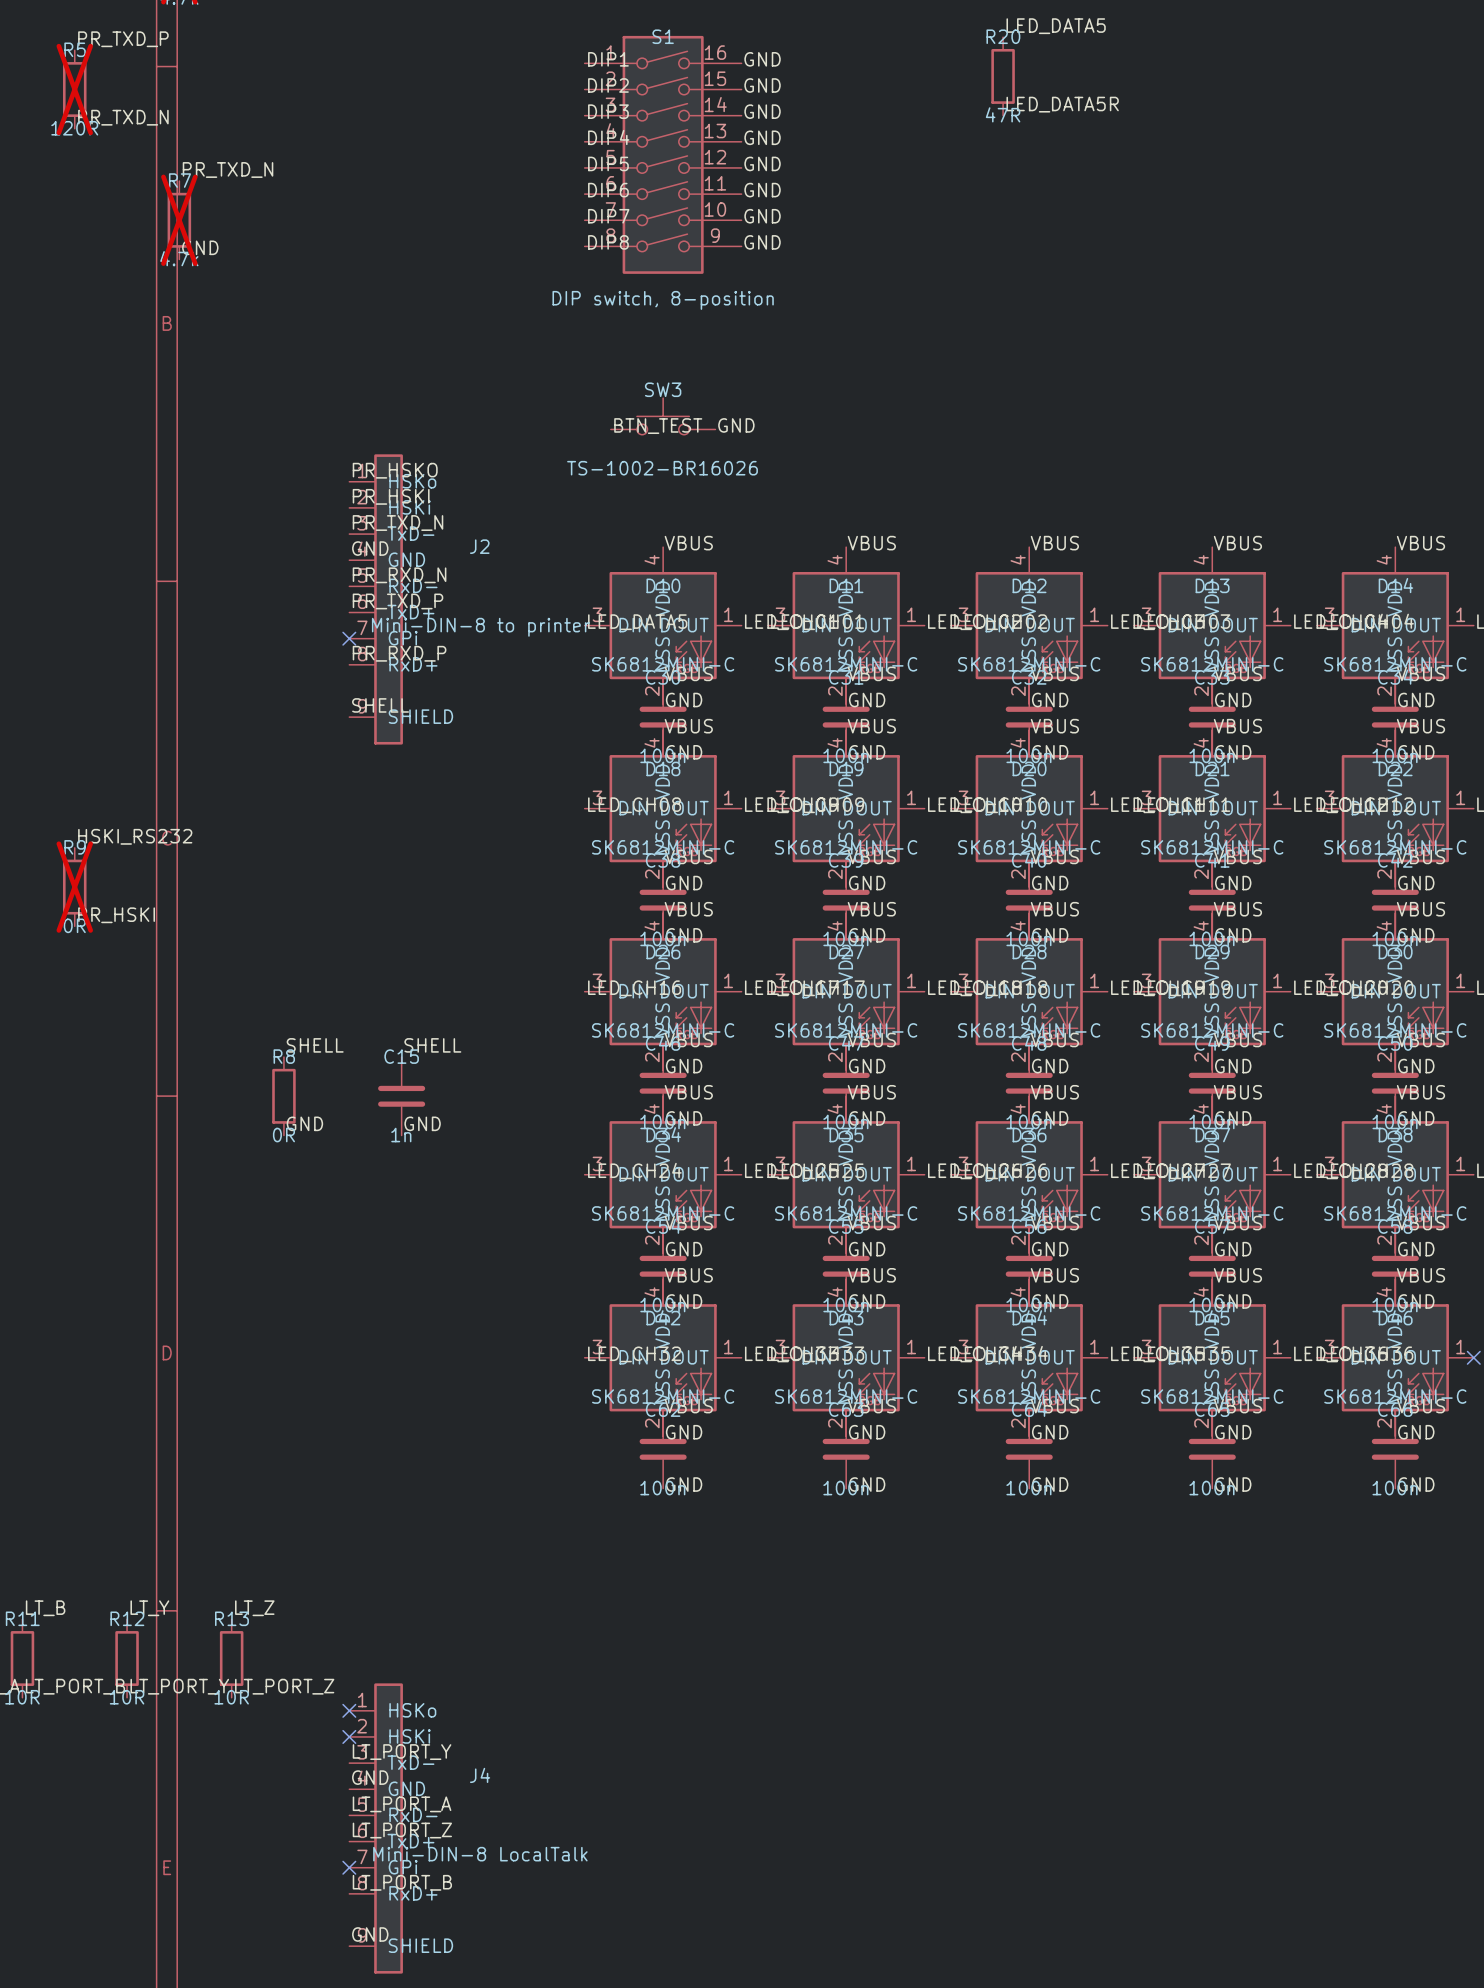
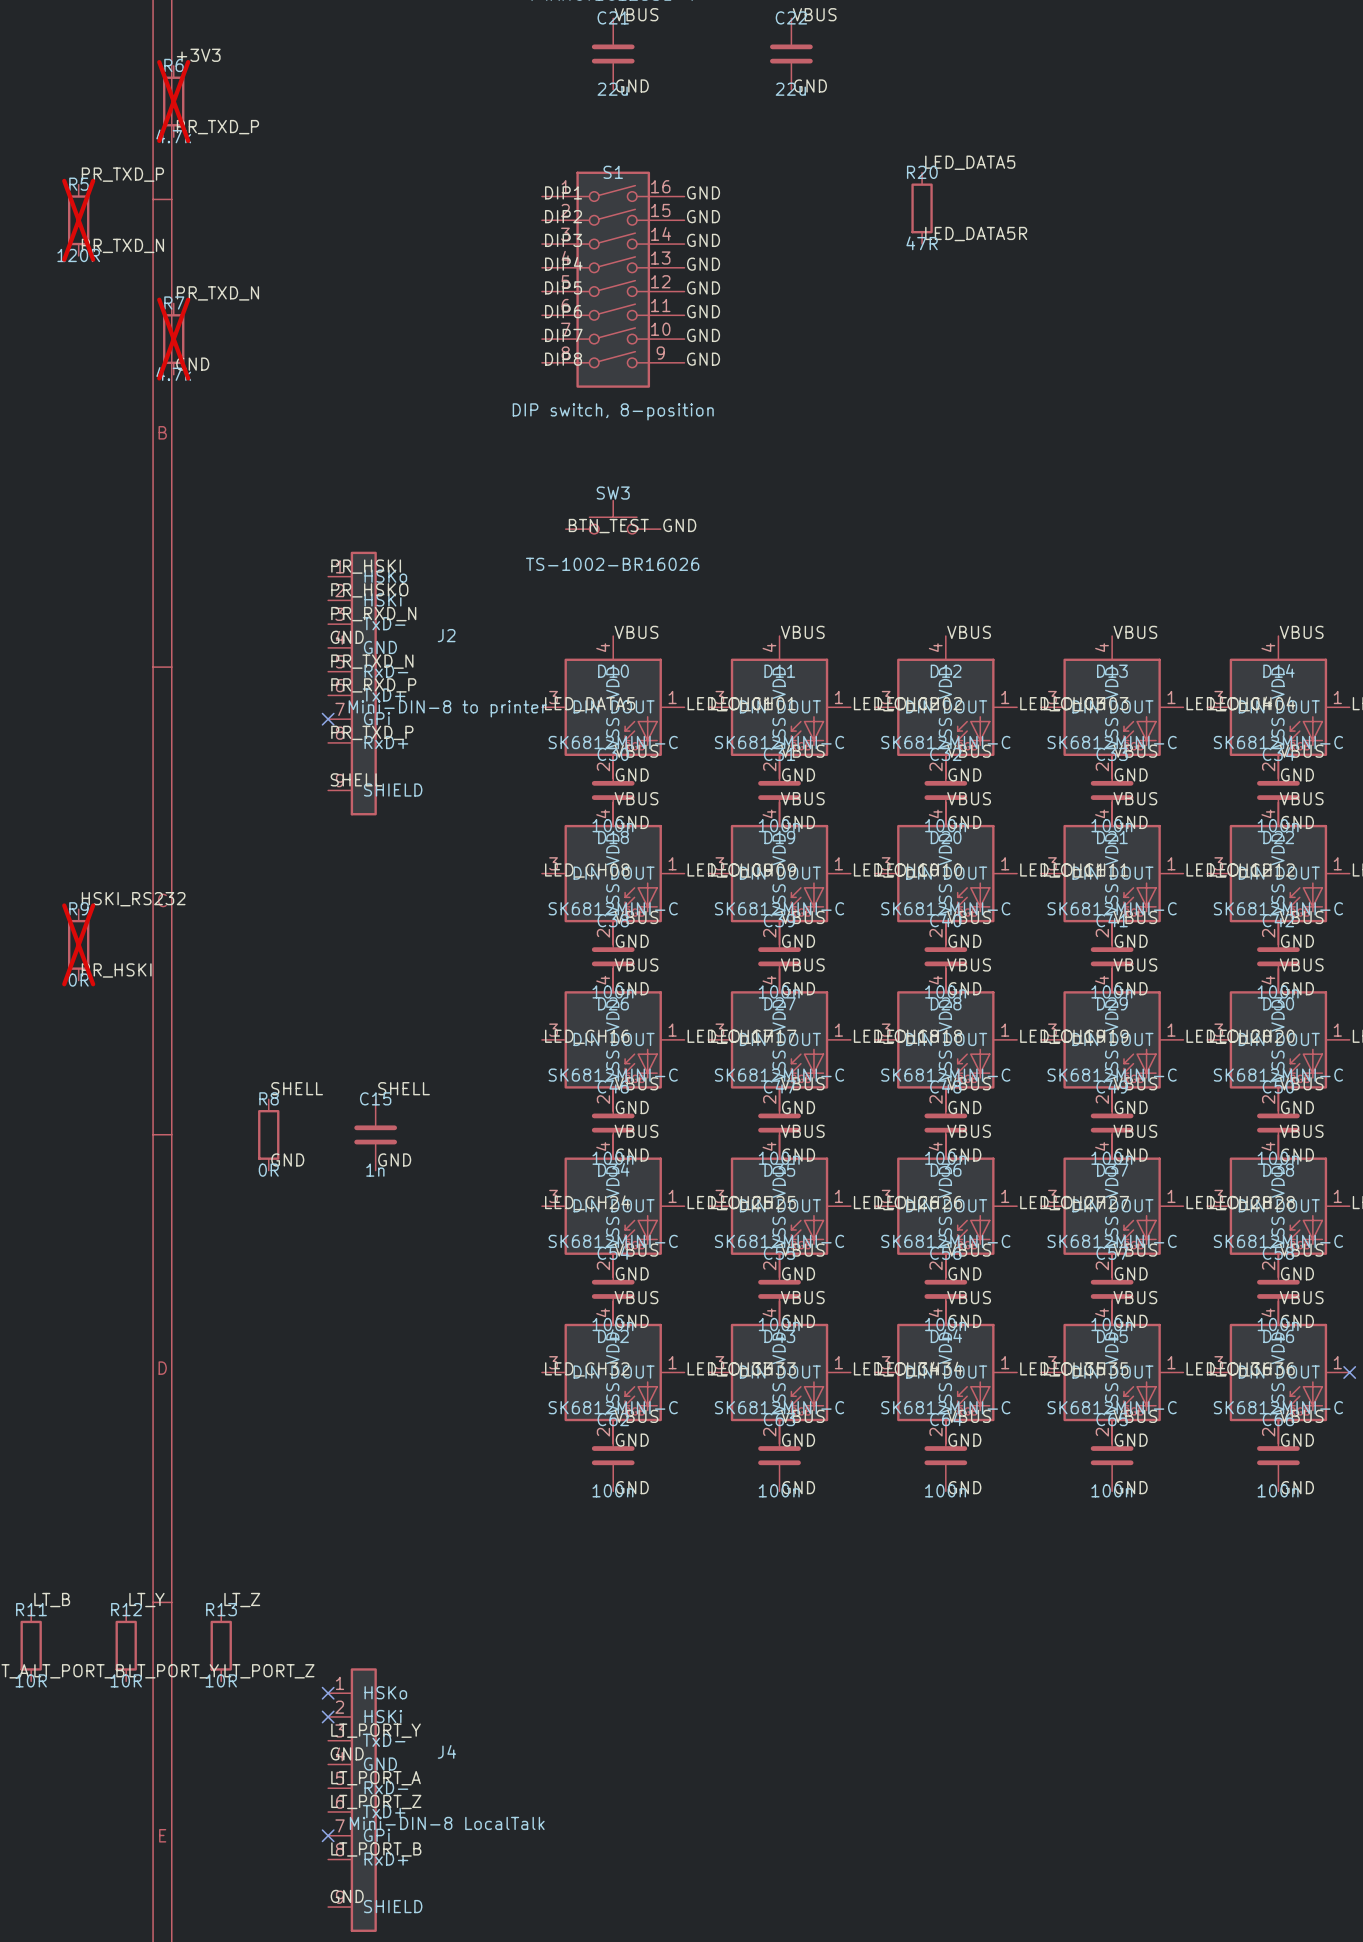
label: PR_HSKO (395, 470) -> PR_HSKI (366, 566)
label: PR_HSKI (391, 496) -> PR_HSKO (369, 590)
label: PR_TXD_N (397, 523) -> PR_RXD_N (373, 614)
label: PR_RXD_N (399, 575) -> PR_TXD_N (372, 661)
label: PR_TXD_P (397, 601) -> PR_RXD_P (373, 685)
label: PR_RXD_P (399, 653) -> PR_TXD_P (372, 732)

